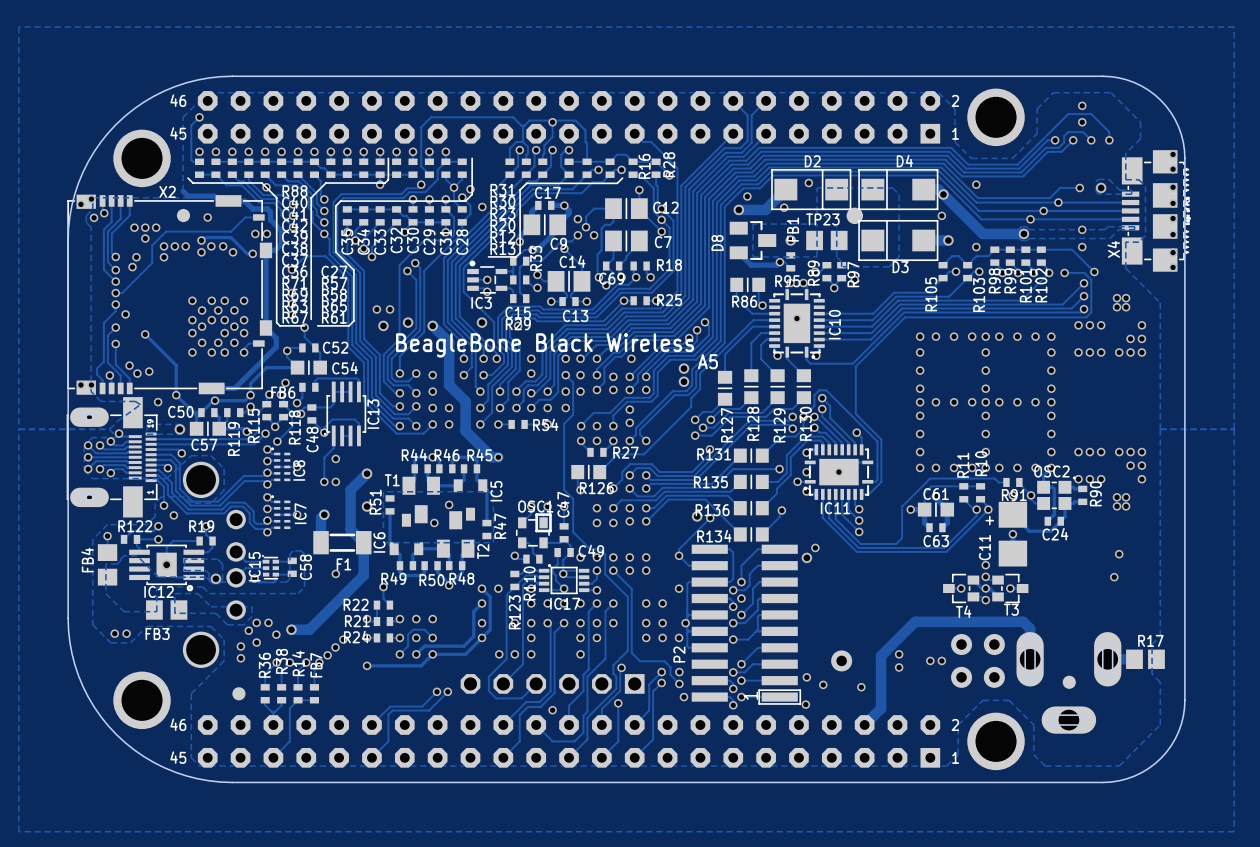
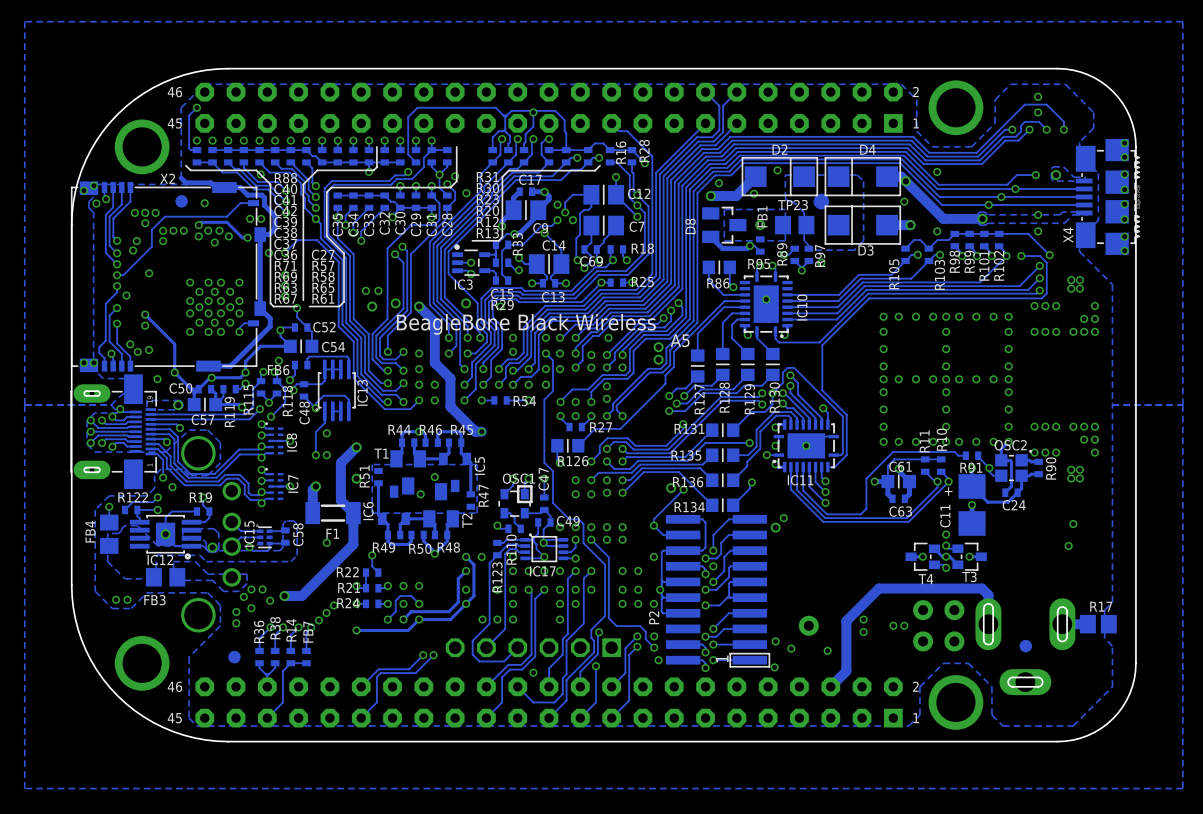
via: none -> (214, 242)
via: none -> (269, 252)
via: none -> (149, 273)
via: none -> (208, 313)
via: none -> (145, 325)

